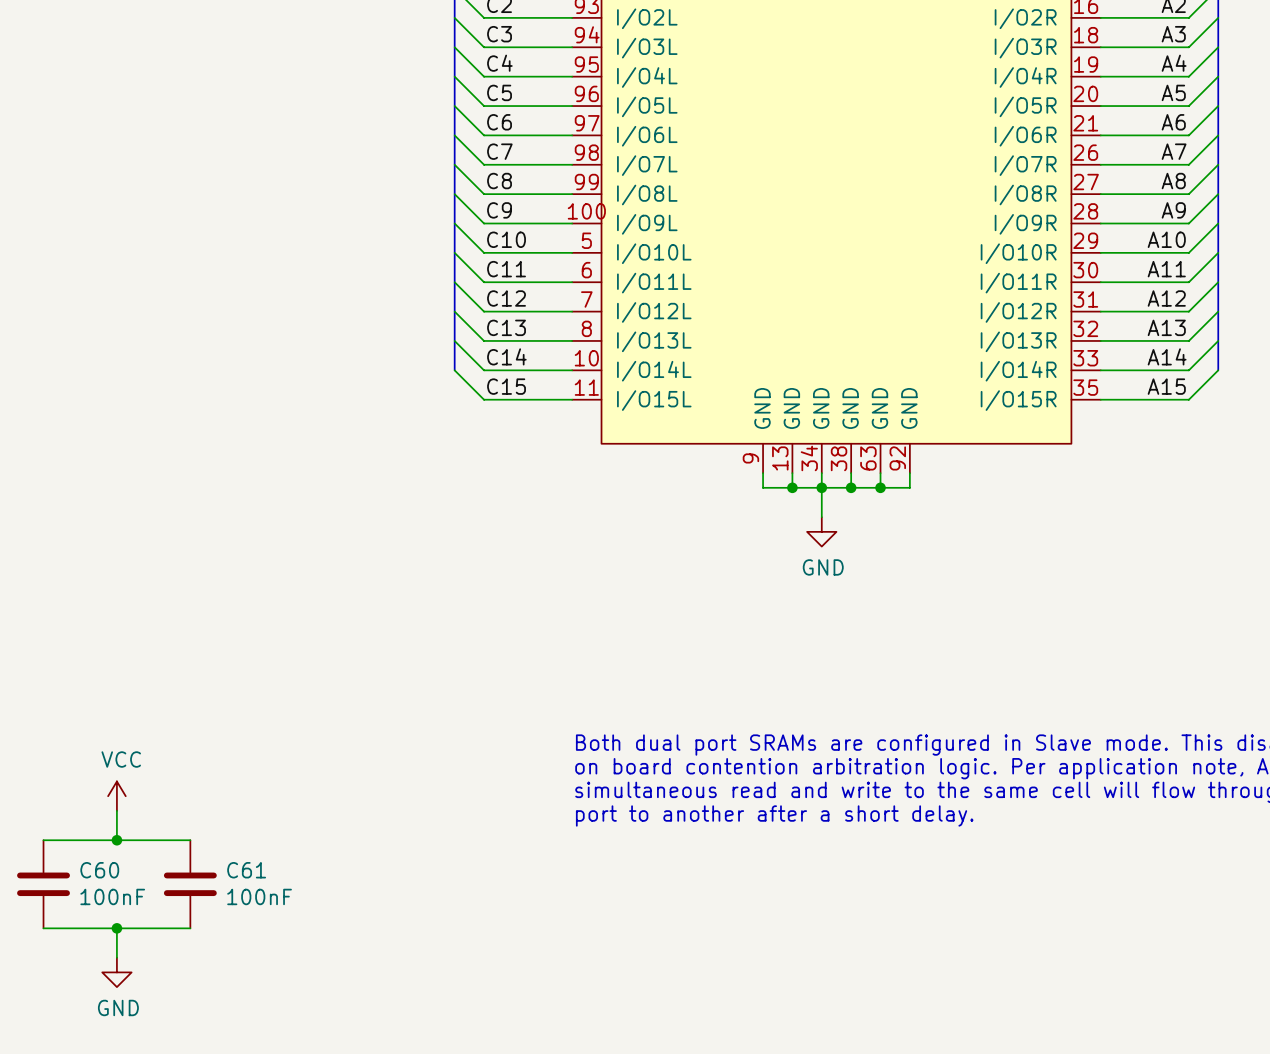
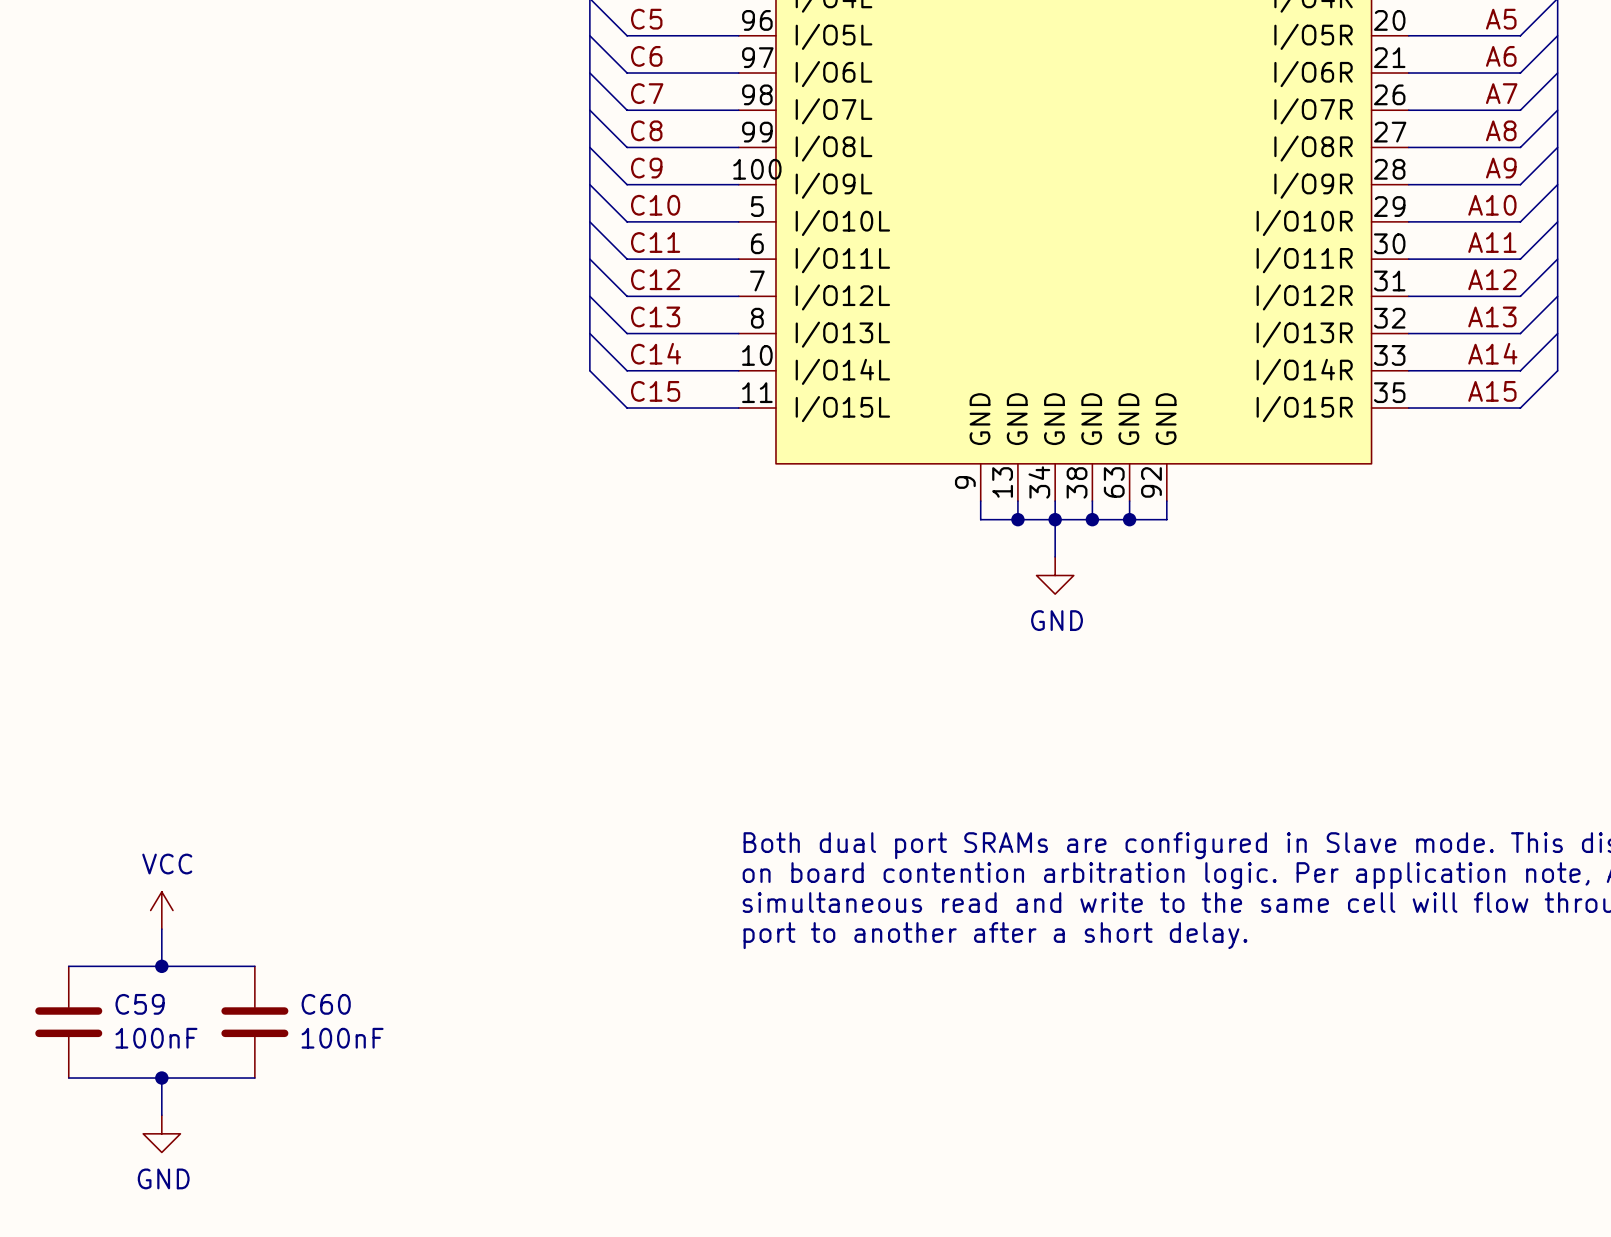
C60 name: C60 (99, 870) -> C59 (140, 1004)
C61 name: C61 (246, 870) -> C60 (326, 1004)

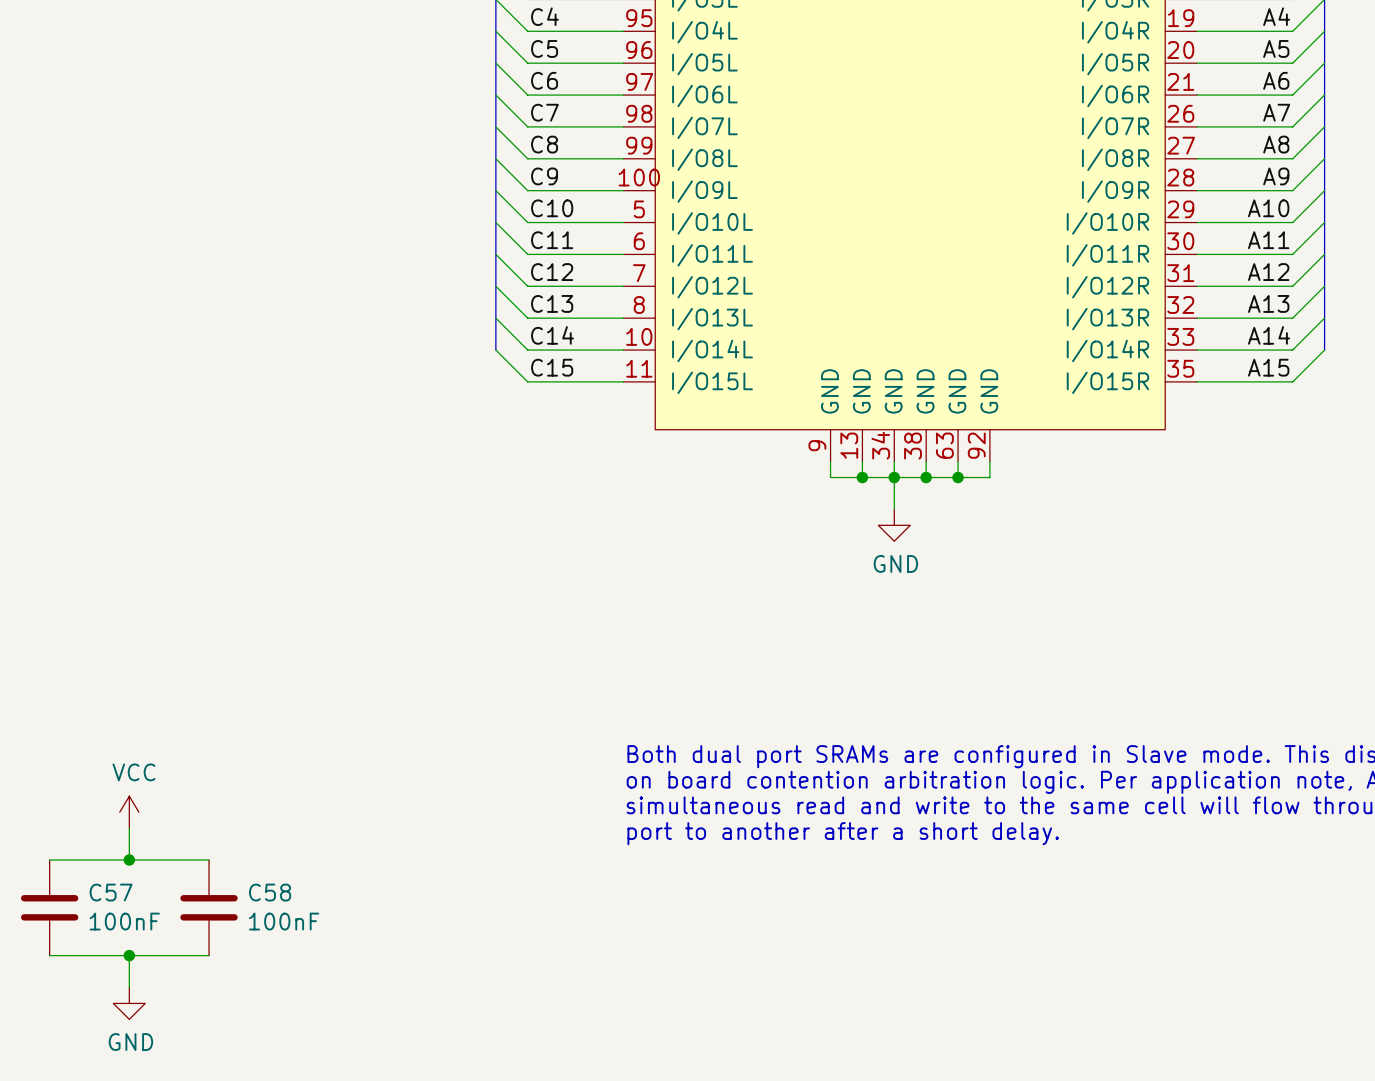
C59 name: C59 (140, 1004) -> C57 (111, 892)
C60 name: C60 (326, 1004) -> C58 (270, 892)

